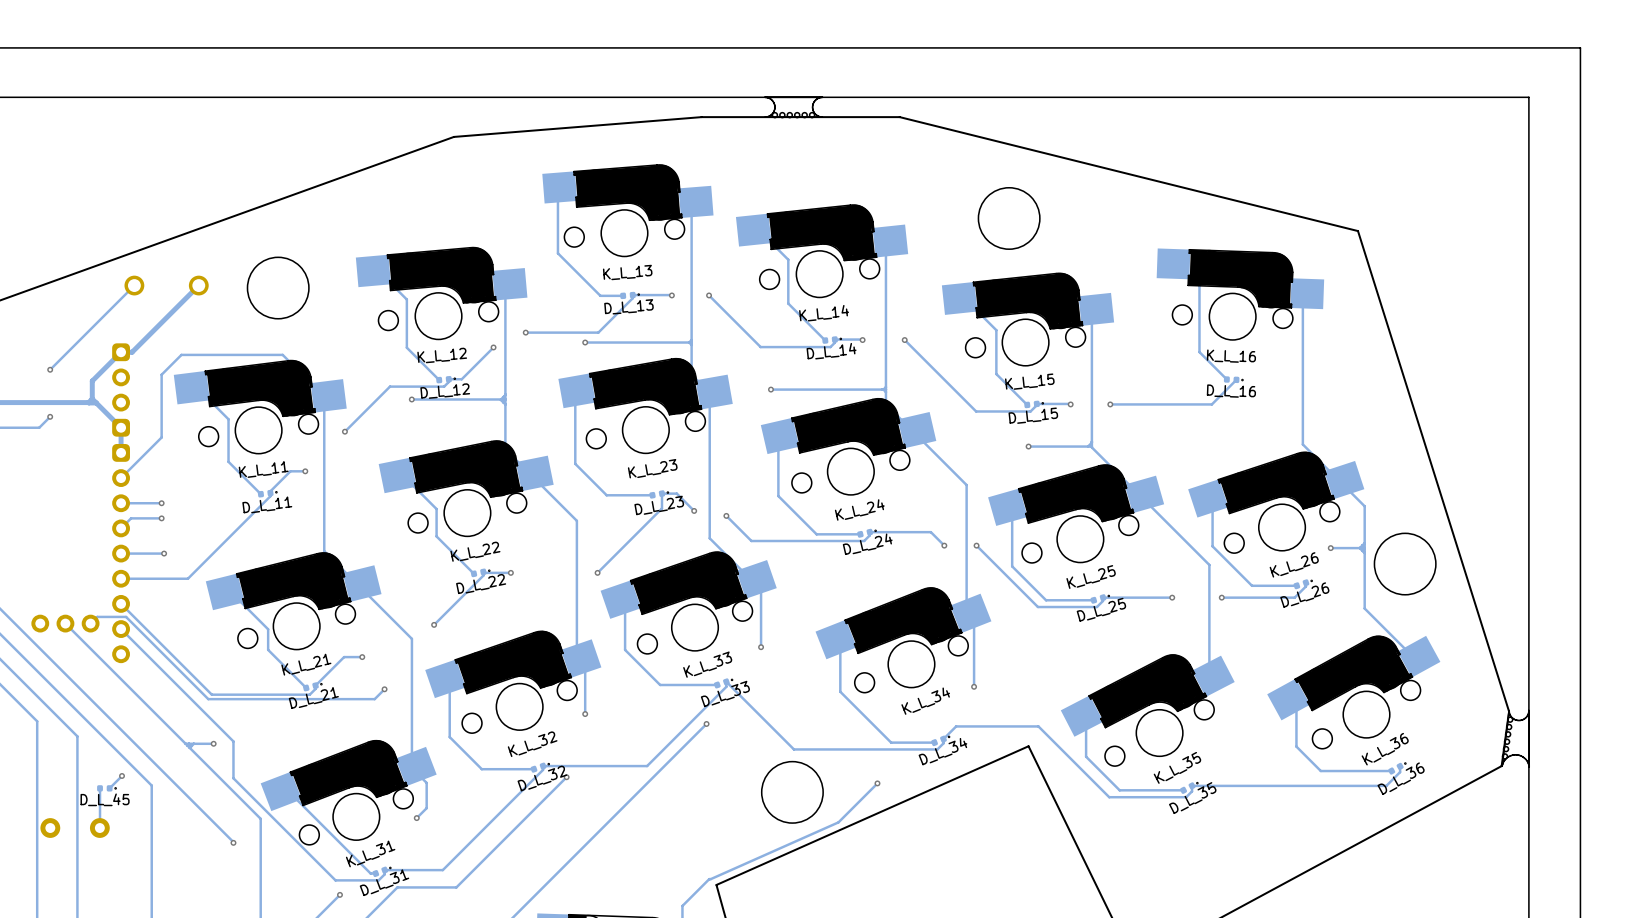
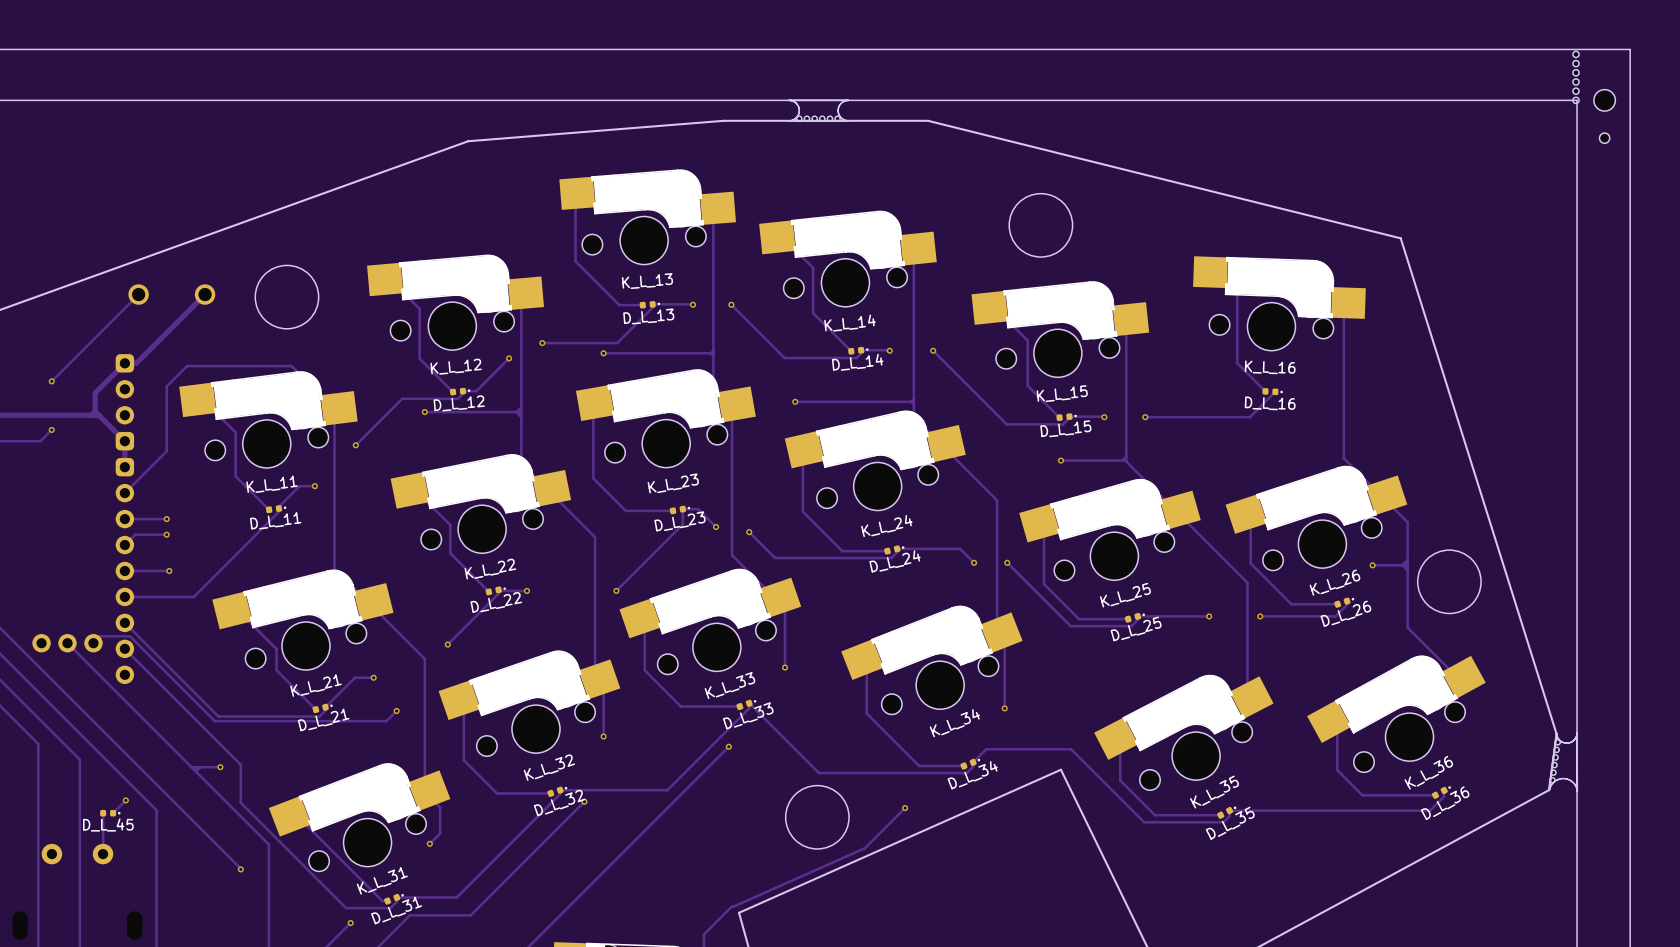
part: none -> (1576, 77)
part: none -> (1604, 100)
part: none -> (1604, 138)

